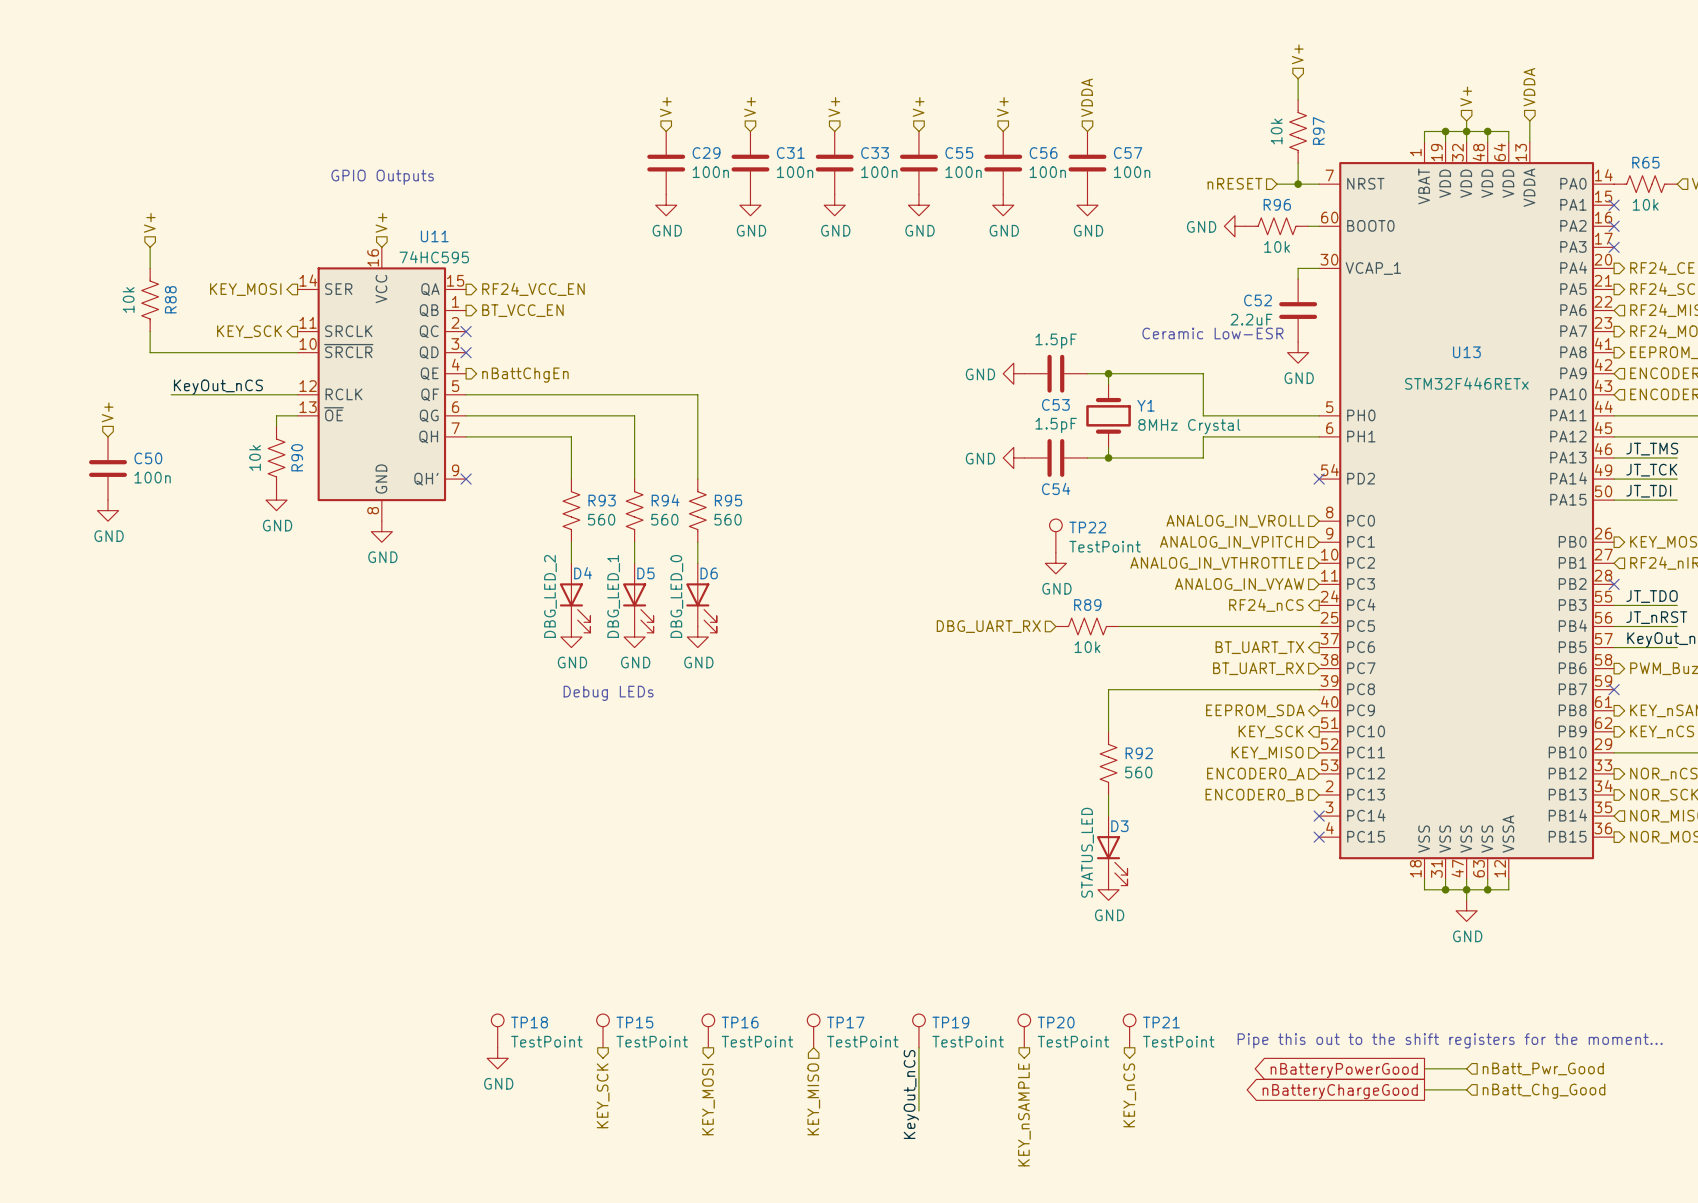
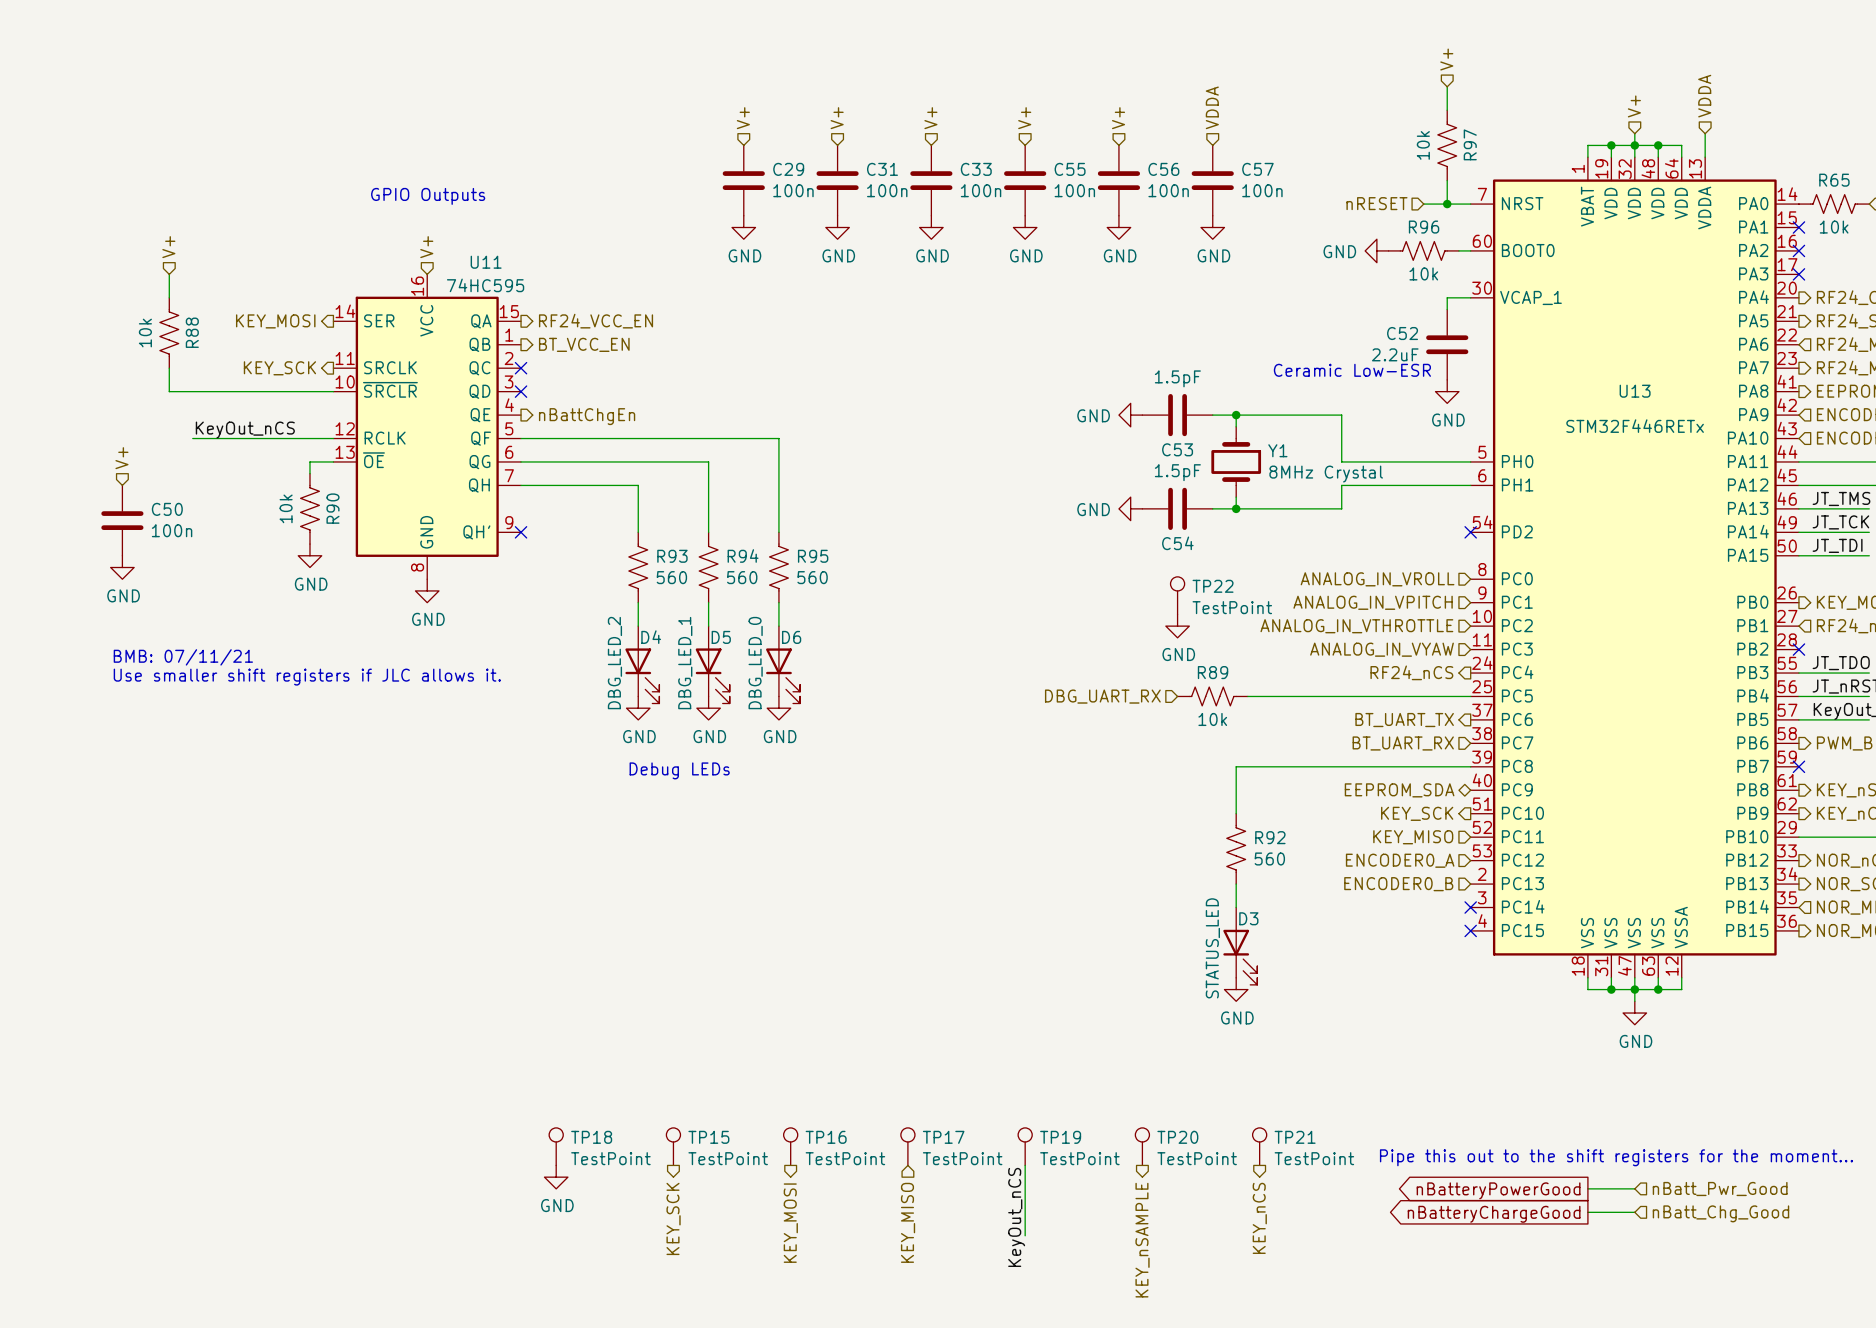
text: none -> BMB: 07/11/21 (183, 657)
text: none -> Use smaller shift registers if JLC allows it. (307, 677)

